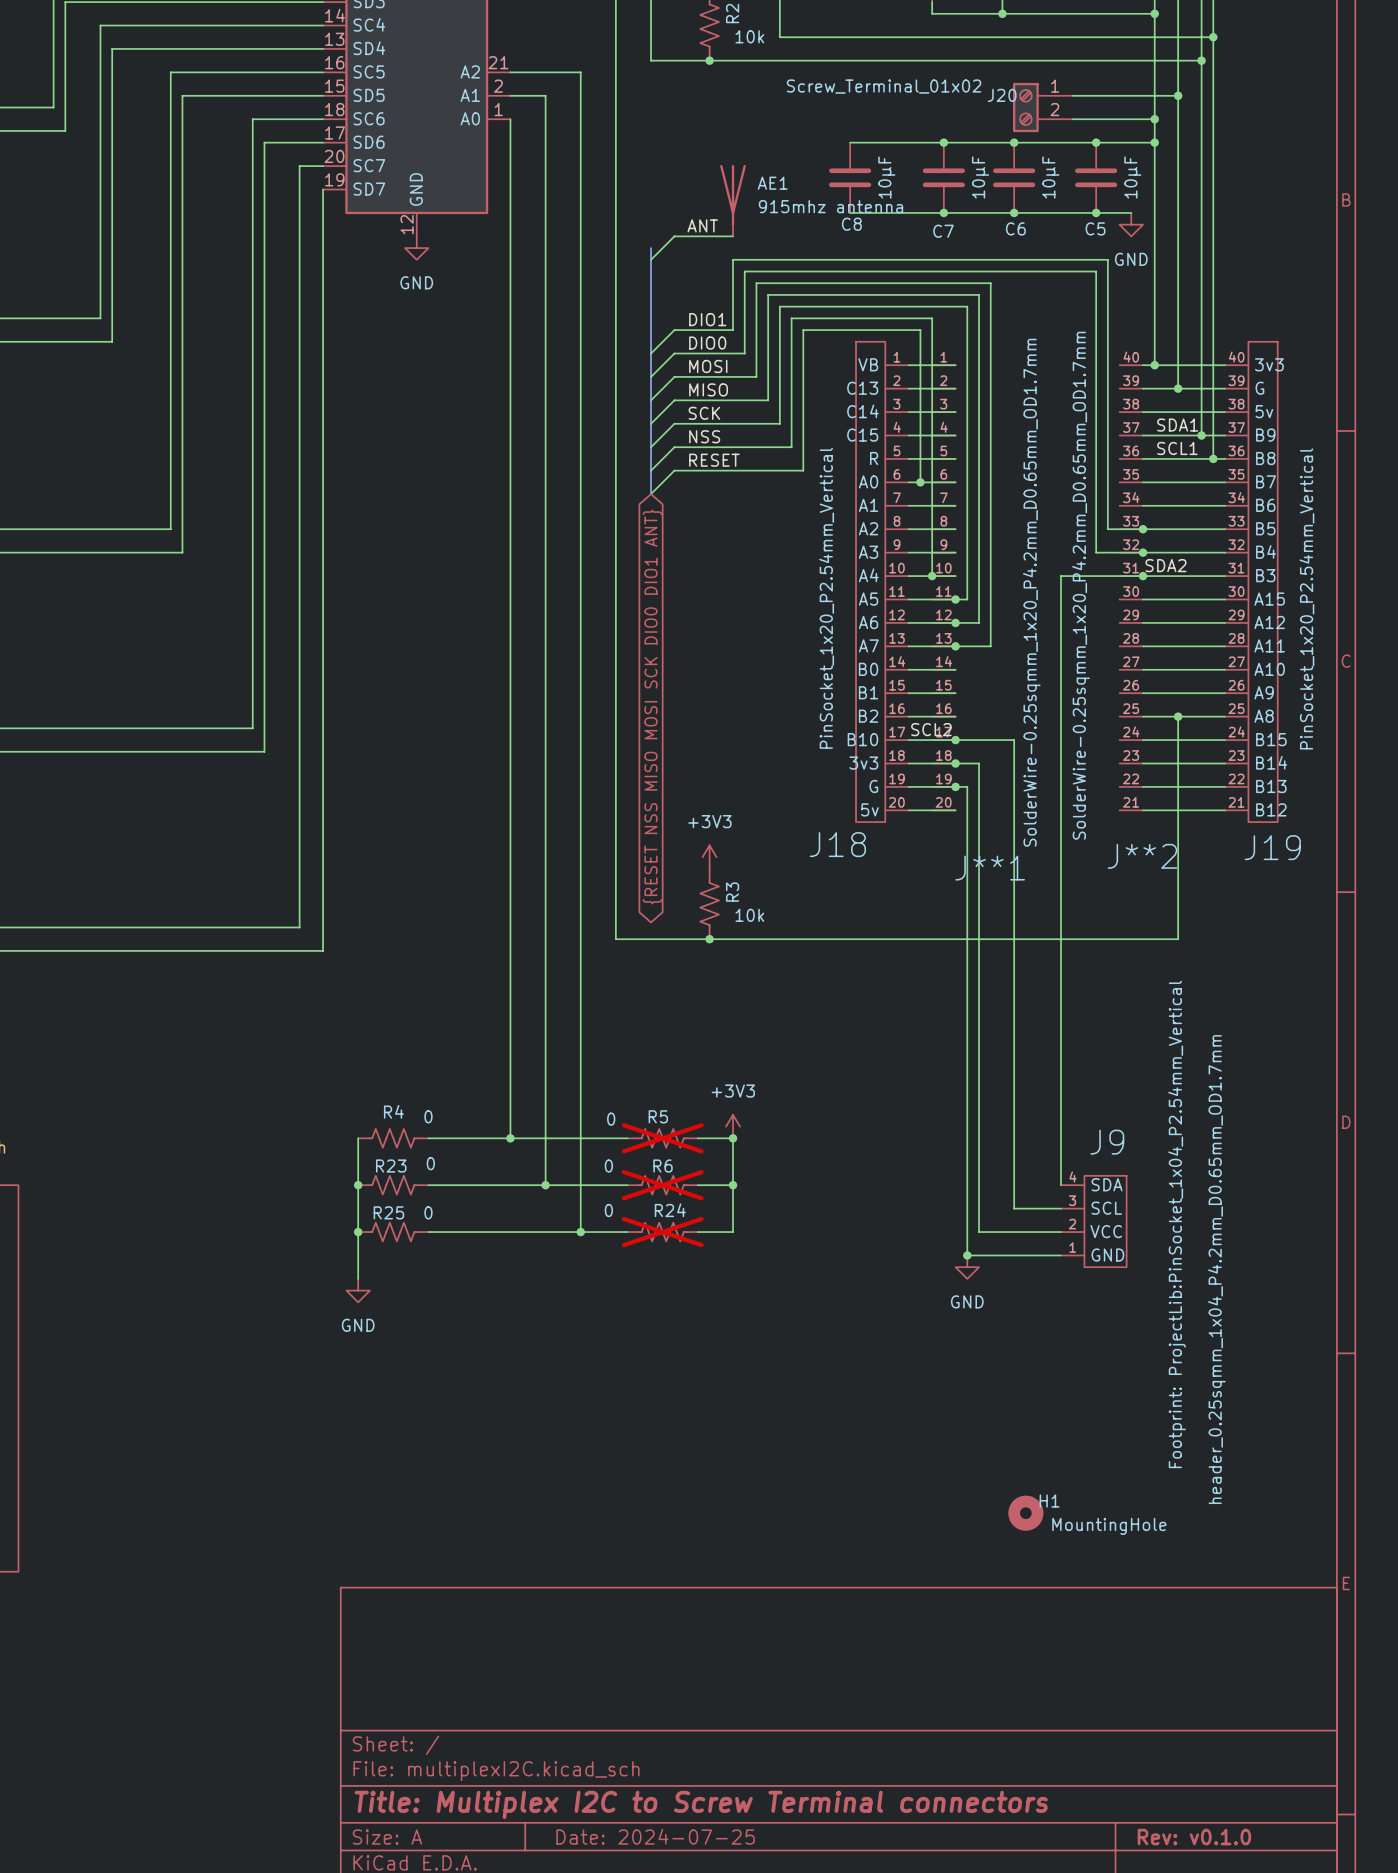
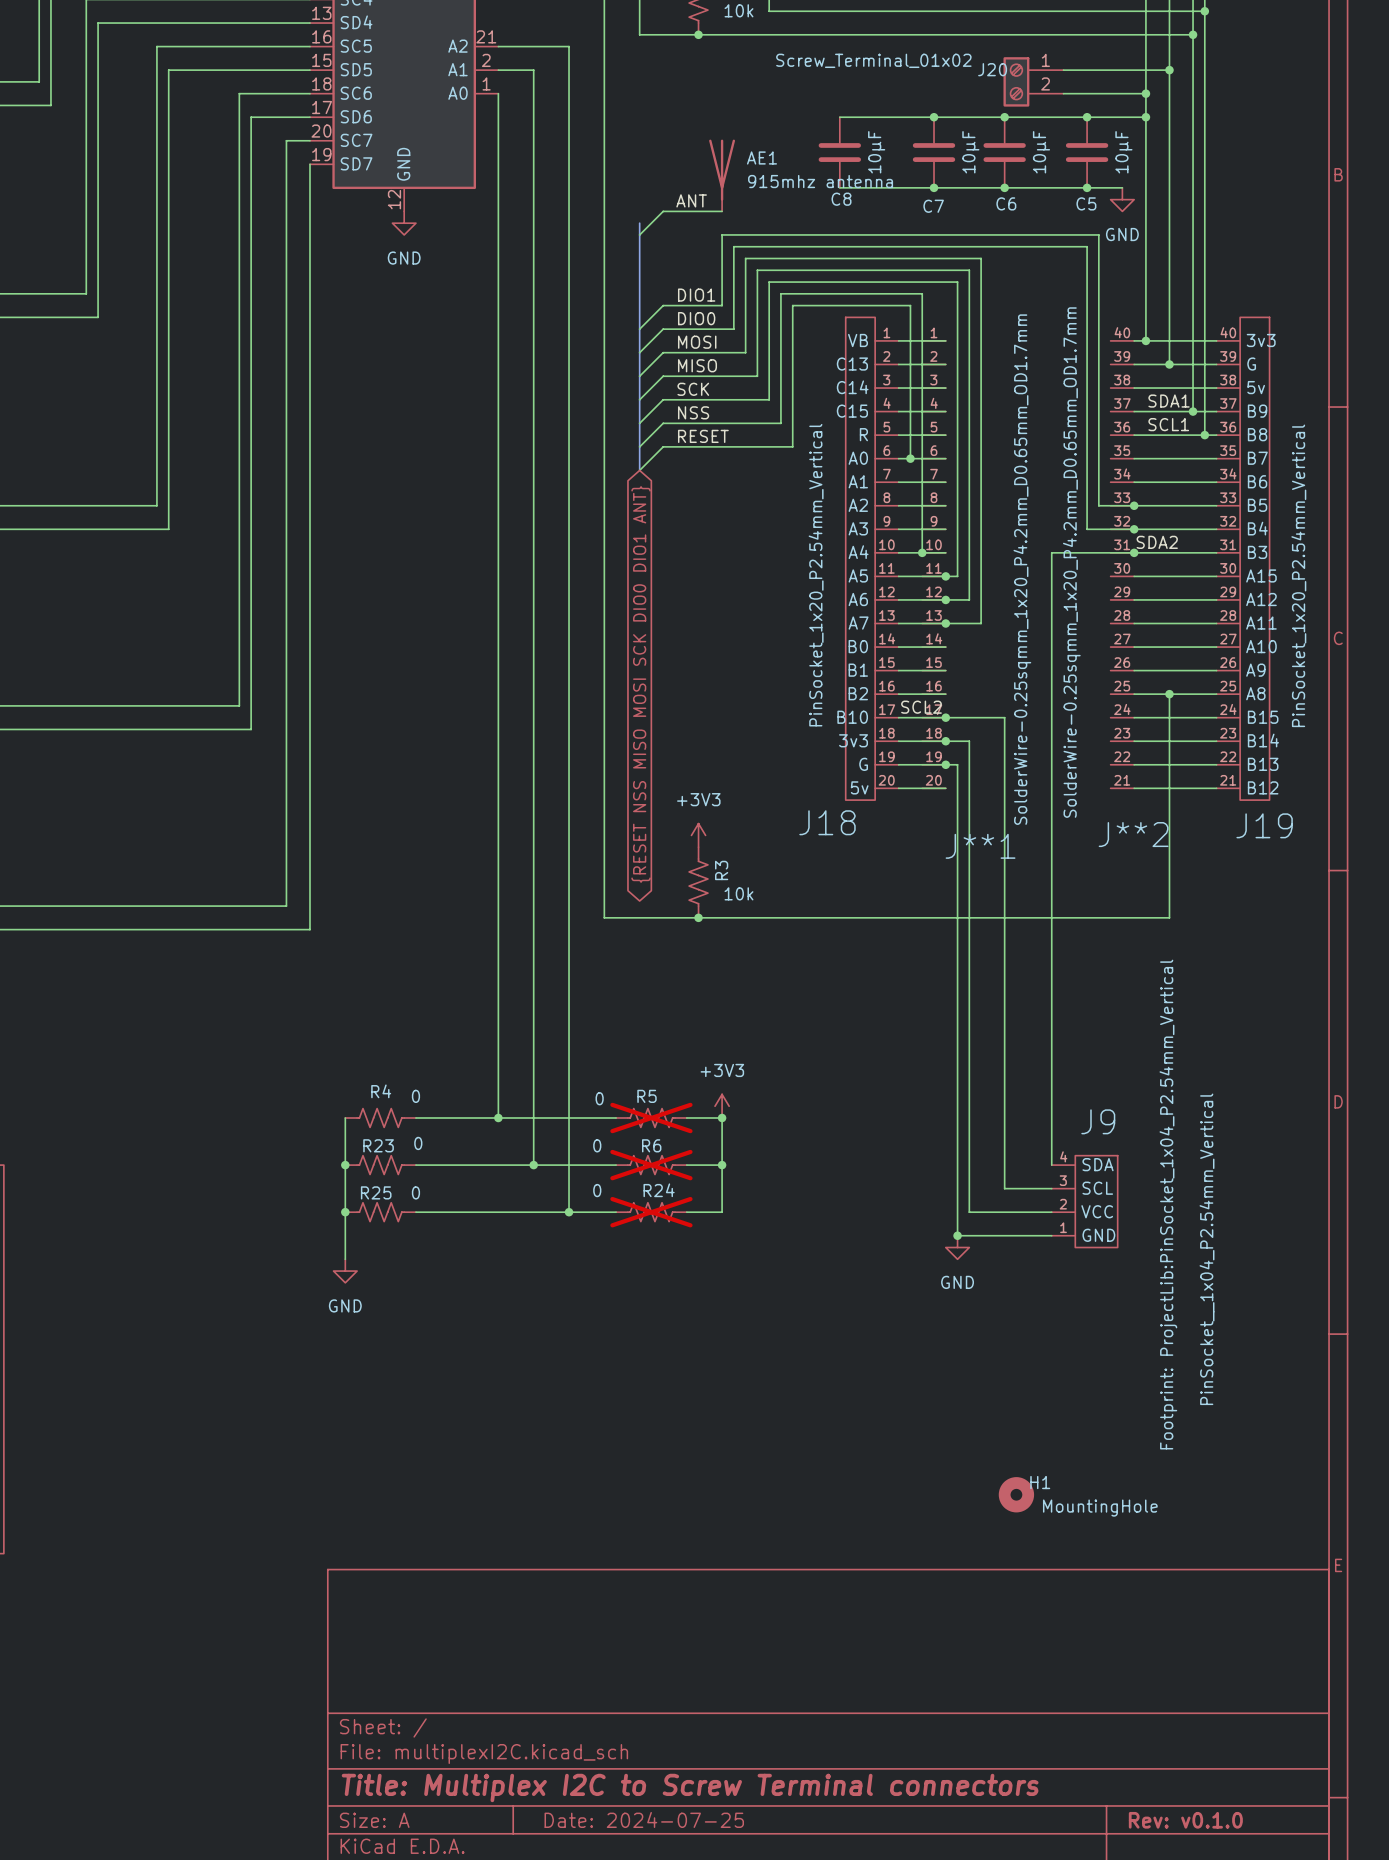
J9 value: header_0.25sqmm_1x04_P4.2mm_D0.65mm_OD1.7mm (1216, 1269) -> PinSocket__1x04_P2.54mm_Vertical (1207, 1249)

